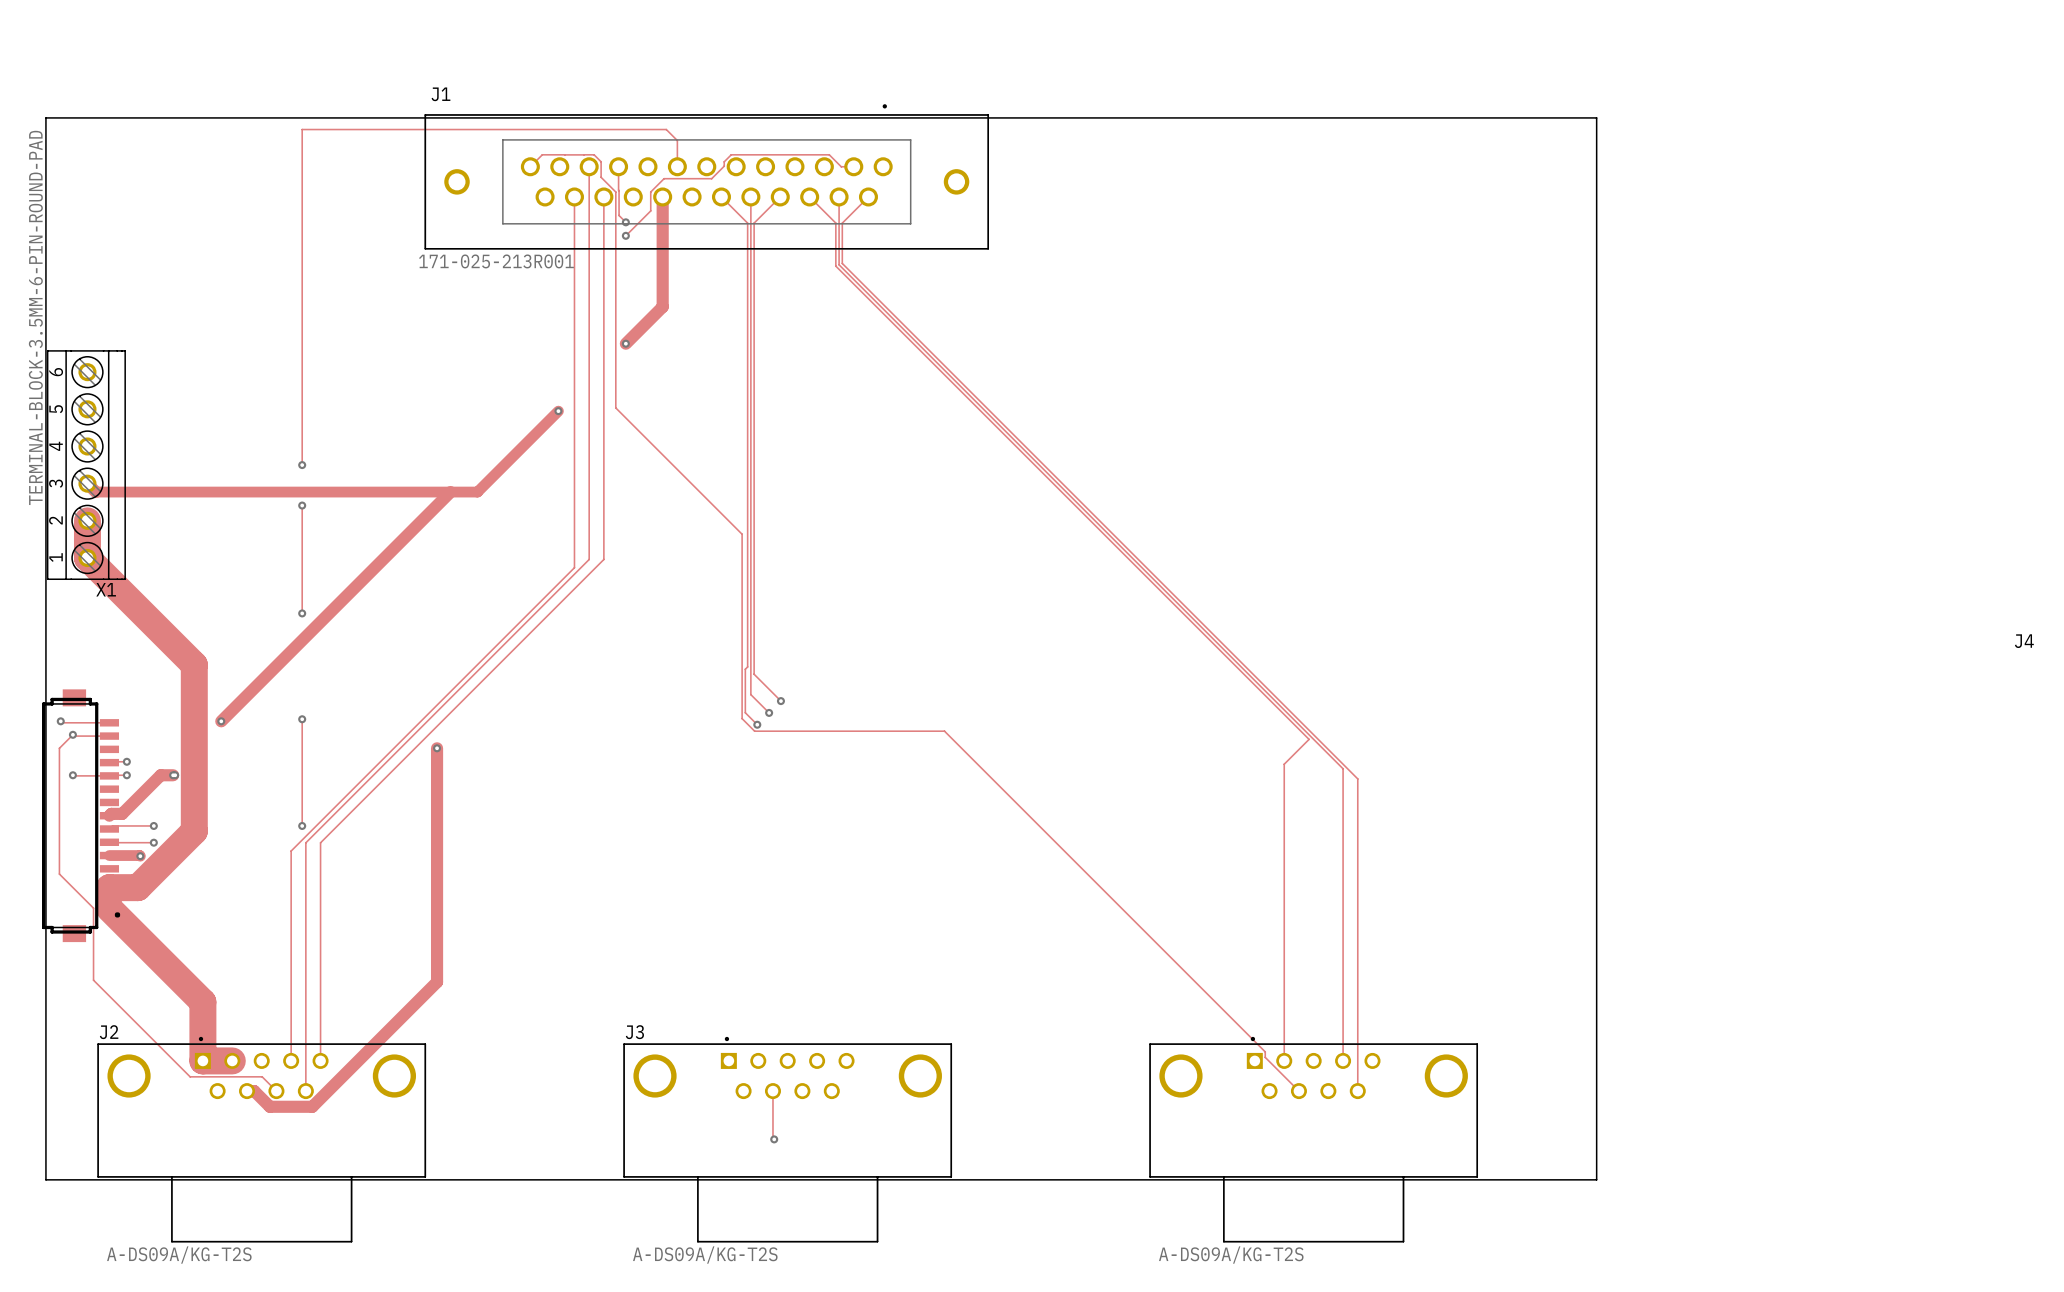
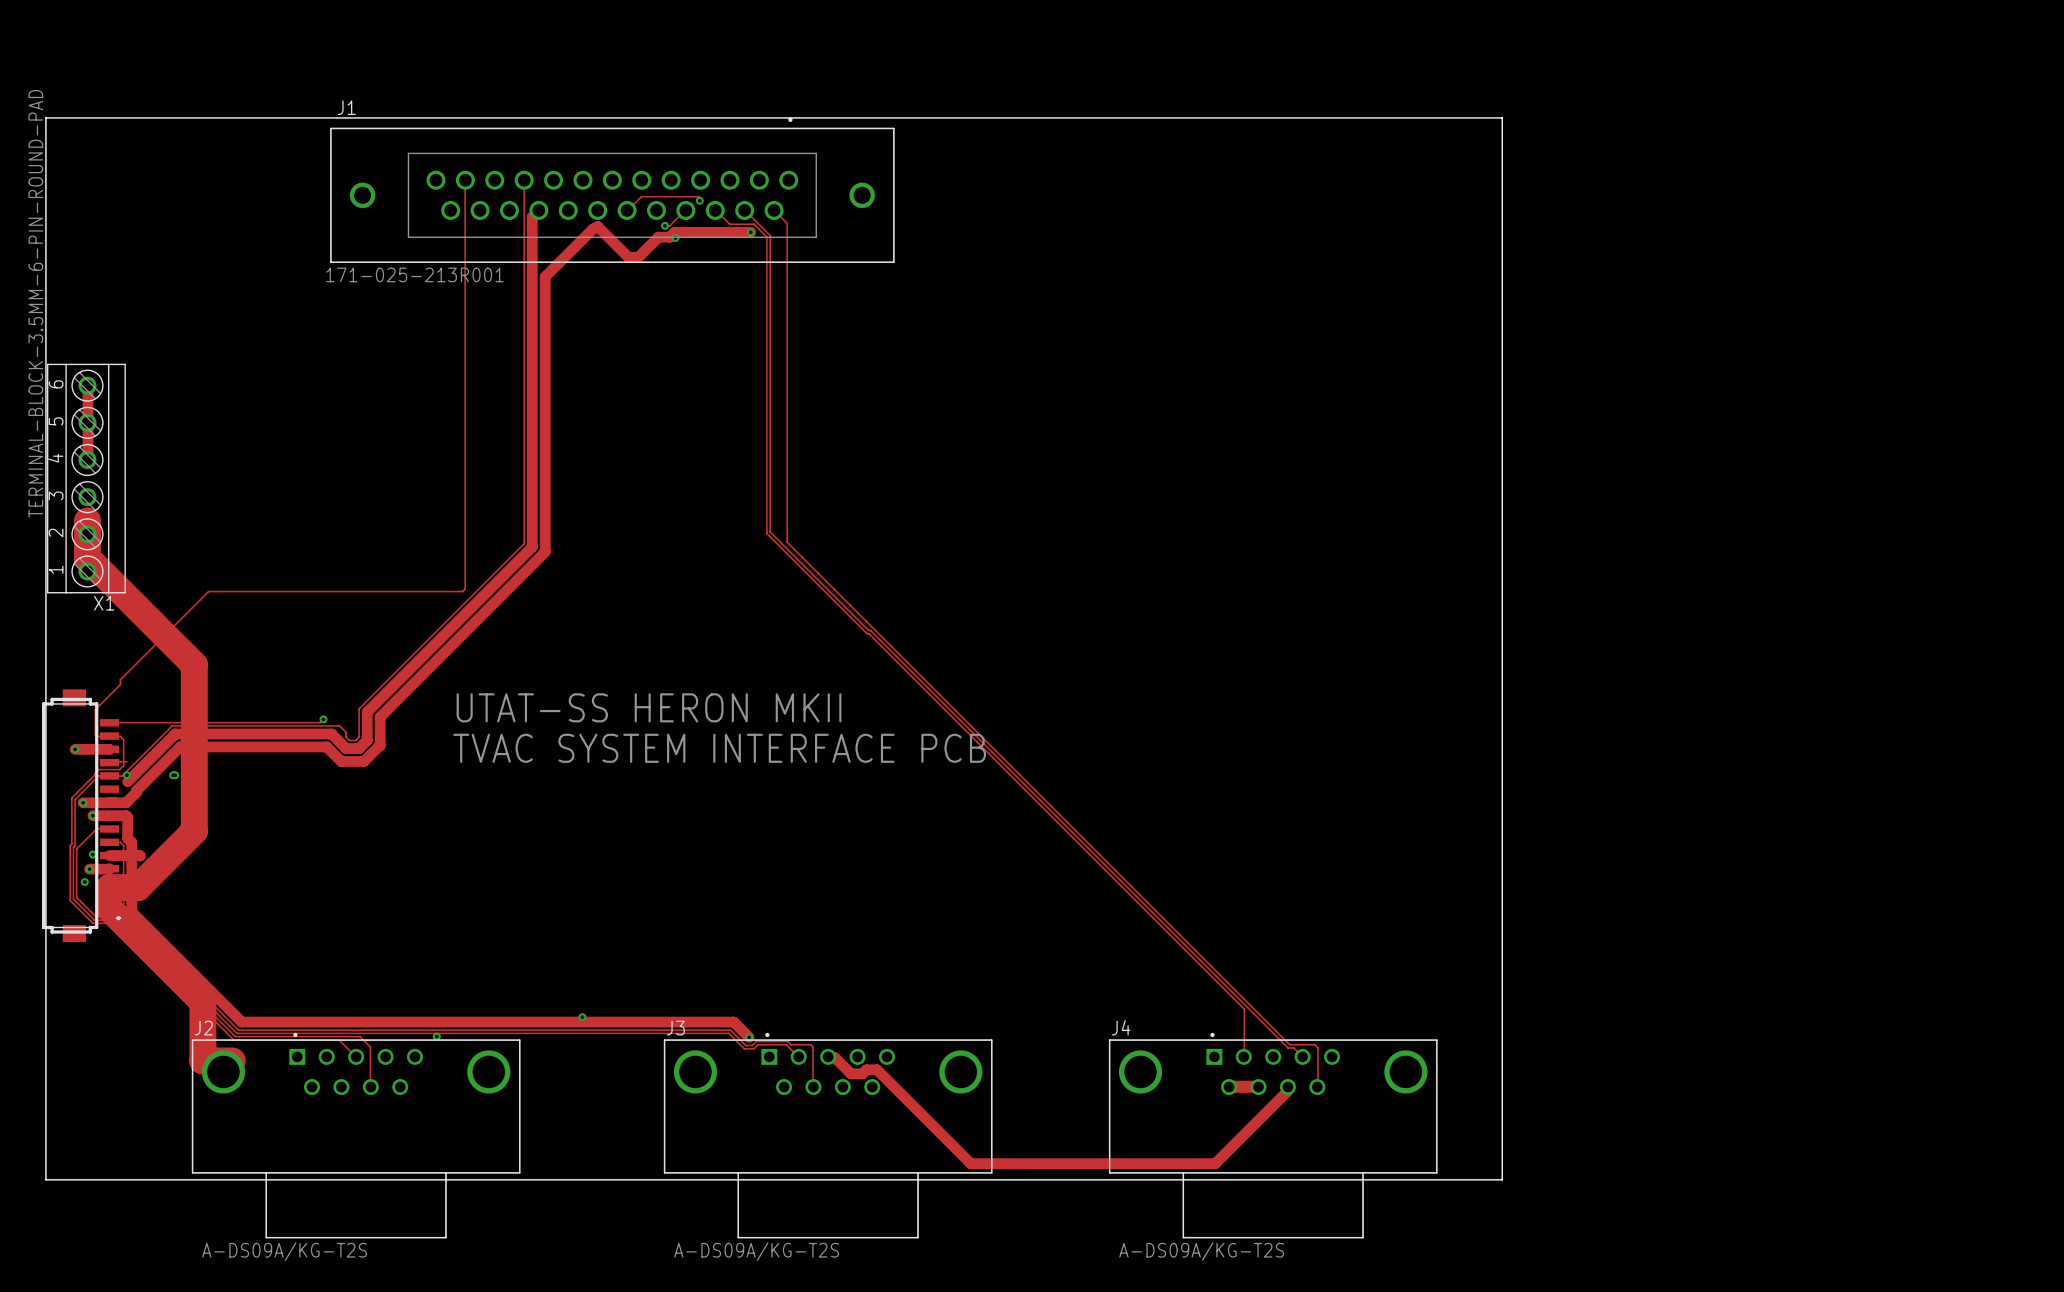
board edge: (1502, 117) (1596, 117) (1596, 1179) (1502, 1179) -> (1502, 117) (1502, 1179)
track: (564, 154) (542, 154) (530, 166) -> none
track: (564, 154) (584, 154) -> none
track: (584, 154) (594, 154) (601, 161) (601, 177) (615, 192) (615, 407) (742, 534) (742, 718) (754, 731) (944, 731) (1265, 1051) (1265, 1057) (1298, 1091) -> none
track: (589, 166) (589, 559) (305, 842) (305, 1091) -> none
track: (618, 166) (619, 215) (625, 222) -> none
track: (677, 166) (677, 140) (666, 129) (302, 129) (302, 465) -> none
track: (853, 166) (841, 166) (829, 154) (731, 154) (724, 161) (724, 166) (711, 178) (664, 178) (650, 192) (650, 210) (625, 235) -> none
J1 position: (706, 176) -> (612, 190)
track: none -> (465, 180) (465, 589) (462, 591) (208, 591) (120, 679) (120, 684) (95, 709) (95, 734) (96, 736) (120, 736) (123, 739) (123, 765) (119, 769) (98, 769) (71, 797) (70, 900) (92, 923) (117, 923) (233, 1039) (338, 1039) (356, 1056)
track: none -> (524, 180) (524, 543) (359, 708) (359, 737) (355, 740) (349, 740) (346, 737) (346, 732) (339, 725) (172, 725) (122, 776) (98, 776) (75, 799) (73, 899) (94, 920) (118, 920) (235, 1036) (359, 1036) (370, 1047) (370, 1087)
track: (574, 196) (574, 567) (291, 851) (291, 1060) -> none
track: (603, 196) (603, 559) (320, 842) (320, 1060) -> none
track: (662, 196) (662, 306) (625, 343) -> none
track: (721, 196) (747, 223) (747, 666) (745, 669) (745, 712) (757, 724) -> none
track: (750, 196) (750, 694) (769, 712) -> none
track: (780, 196) (754, 223) (754, 674) (780, 701) -> none
track: (809, 196) (835, 223) (835, 266) (1309, 739) (1284, 764) (1284, 1060) -> none
track: (839, 196) (839, 264) (1343, 768) (1343, 1060) -> none
track: (868, 196) (842, 223) (842, 263) (1357, 778) (1357, 1091) -> none
track: none -> (699, 200) (698, 196) (641, 196) (627, 210)
via: none -> (699, 200)
track: none -> (538, 210) (532, 216) (532, 547) (367, 712) (367, 740) (359, 748) (346, 748) (331, 733) (175, 733) (127, 781)
track: none -> (685, 210) (669, 225) (664, 225)
track: none -> (715, 210) (729, 224) (753, 224) (766, 237) (766, 533) (1244, 1009) (1243, 1056)
track: none -> (744, 210) (770, 235) (770, 531) (1288, 1047) (1293, 1047) (1302, 1056)
track: none -> (774, 210) (787, 223) (787, 542) (1289, 1044) (1314, 1044) (1317, 1047) (1317, 1087)
via: (625, 222) -> none
via: none -> (664, 225)
track: none -> (750, 232) (674, 232) (669, 237) (658, 237) (638, 257) (628, 257) (597, 226) (592, 229) (545, 276) (545, 551) (380, 717) (380, 745) (363, 761) (341, 761) (326, 746) (180, 746) (126, 802) (83, 802)
via: none -> (750, 232)
via: (625, 235) -> none
via: none -> (675, 237)
via: (625, 343) -> none
track: none -> (87, 385) (87, 459)
track: (558, 411) (477, 492) (95, 492) (87, 483) -> none
via: (558, 411) -> none
X1 position: (86, 465) -> (86, 478)
via: (302, 465) -> none
track: (450, 492) (221, 721) -> none
track: (302, 505) (302, 613) -> none
via: (302, 505) -> none
via: (302, 613) -> none
J4 name position: J4 (2024, 641) -> J4 (1121, 1027)
via: (780, 701) -> none
text: none -> UTAT-SS HERON MKII (649, 707)
via: (769, 712) -> none
track: (302, 719) (302, 825) -> none
via position: (302, 719) -> (323, 719)
track: (60, 721) (109, 722) -> (323, 719) (320, 722) (109, 722)
via: (60, 721) -> none
via: (221, 721) -> none
via: (757, 724) -> none
via: (72, 734) -> none
track: (109, 736) (72, 734) (59, 748) (59, 874) (93, 908) (93, 980) (190, 1076) (262, 1076) (276, 1091) -> none
track: (437, 748) (437, 982) (312, 1106) (269, 1106) (254, 1091) (247, 1091) -> none
via: (437, 748) -> none
text: none -> TVAC SYSTEM INTERFACE PCB (719, 748)
track: none -> (75, 749) (109, 749)
via: none -> (75, 749)
via: (126, 761) -> none
track: (72, 775) (126, 775) -> none
via: (72, 775) -> none
track: (173, 775) (160, 775) (122, 813) (111, 813) (109, 815) -> none
via: none -> (83, 802)
track: none -> (92, 815) (126, 815) (127, 817) (127, 838) (131, 842) (131, 912) (241, 1022) (733, 1022) (749, 1037)
via: none -> (92, 815)
track: (153, 825) (112, 825) (109, 828) -> (798, 1056) (786, 1044) (758, 1044) (753, 1048) (744, 1048) (728, 1033) (236, 1033) (120, 916) (96, 916) (76, 897) (76, 848) (96, 828) (109, 828)
via: (153, 825) -> none
via: (302, 825) -> none
track: (109, 842) (153, 842) -> (109, 842) (120, 842) (123, 845) (123, 915) (238, 1030) (730, 1030) (745, 1045) (752, 1045) (756, 1041) (787, 1041) (791, 1044) (810, 1044) (813, 1047) (813, 1087)
via: (153, 842) -> none
via: none -> (92, 854)
via: (140, 856) -> none
track: none -> (109, 868) (89, 869)
via: none -> (89, 869)
via: none -> (84, 882)
via: none -> (582, 1017)
via: none -> (436, 1036)
via: none -> (749, 1037)
track: none -> (828, 1056) (834, 1057) (851, 1073) (862, 1073) (866, 1069) (876, 1069) (970, 1163) (1215, 1163) (1287, 1091) (1287, 1087)
track: none -> (1229, 1087) (1258, 1087)
track: (772, 1091) (774, 1139) -> none
J2 position: (261, 1139) -> (356, 1135)
via: (774, 1139) -> none
J3 position: (787, 1139) -> (828, 1135)
J4 position: (1313, 1139) -> (1273, 1135)

